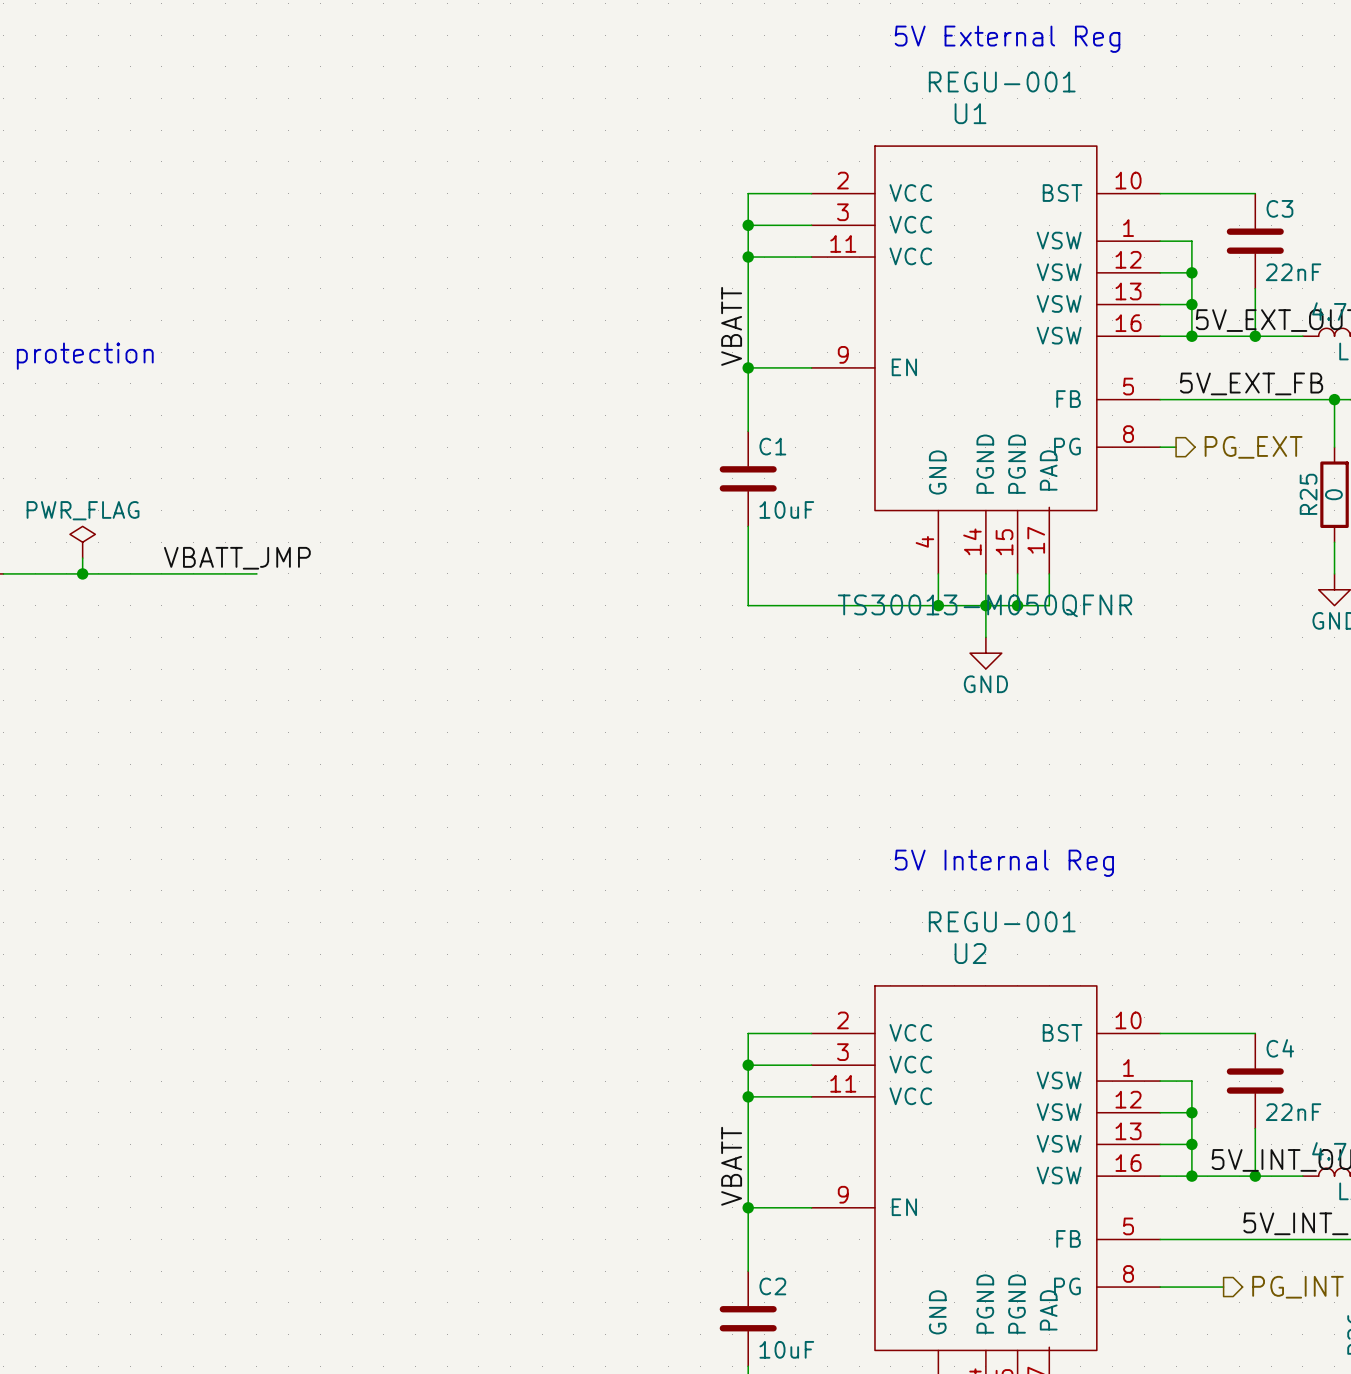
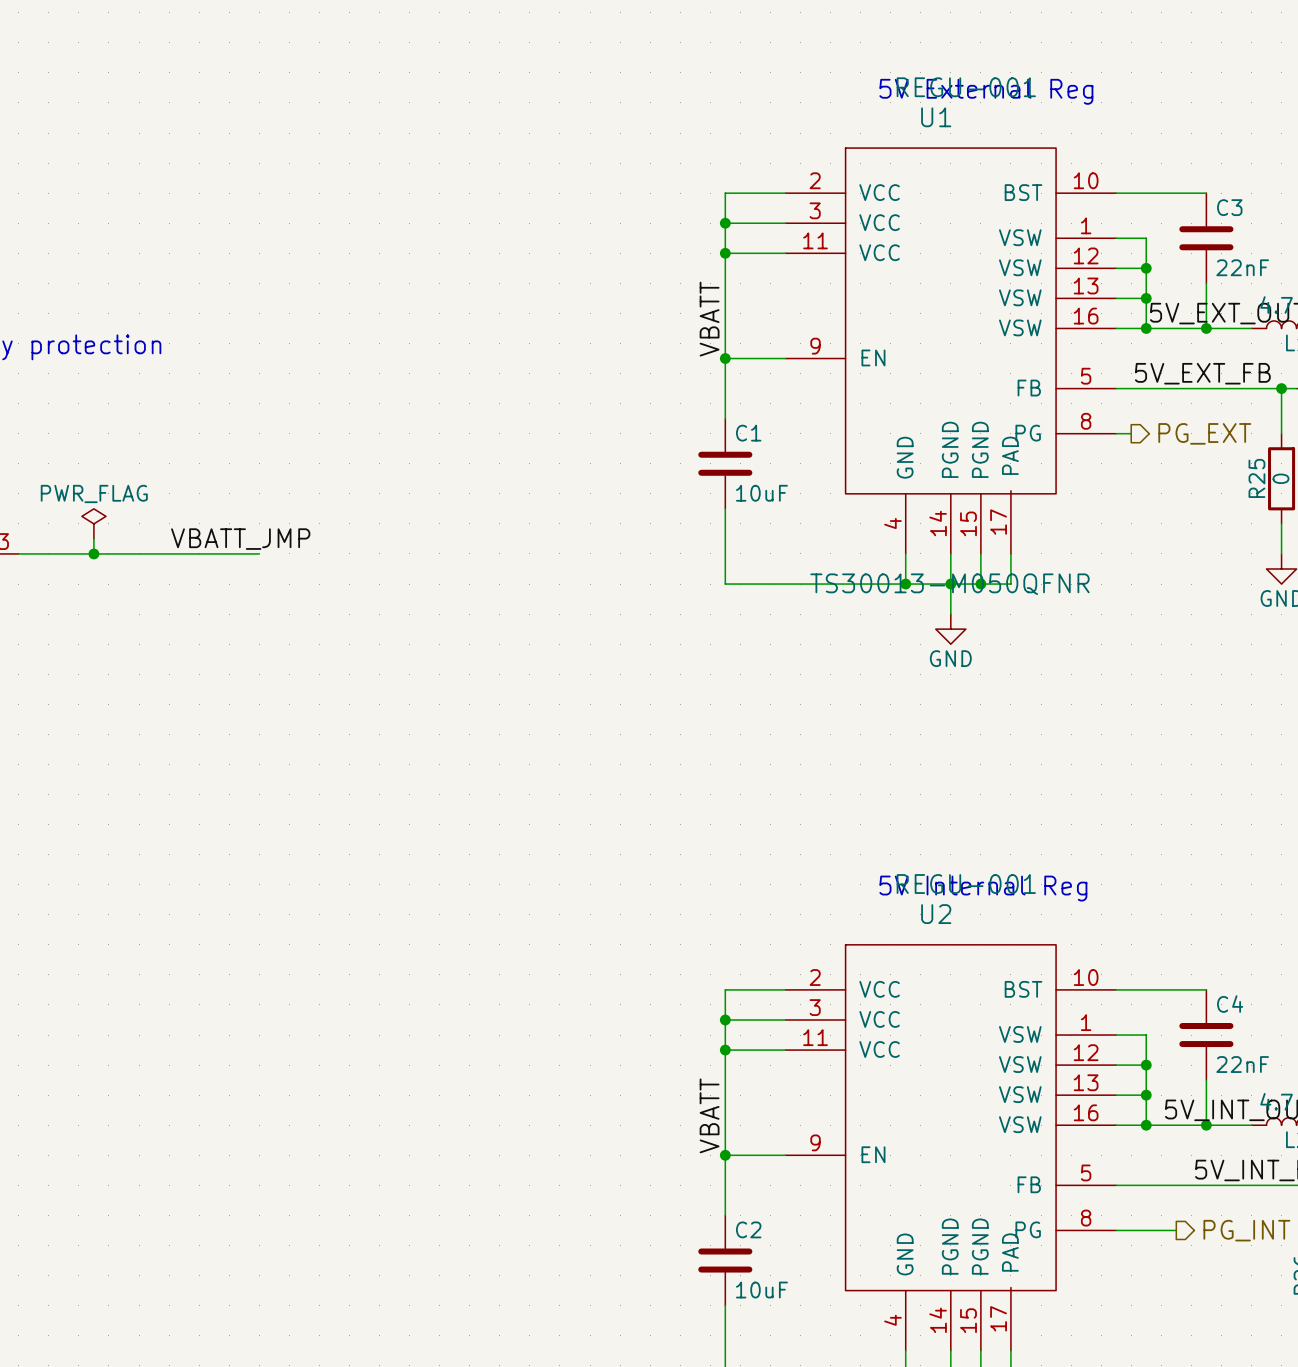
text position: 5V External Reg (1007, 39) -> 5V External Reg (986, 91)
text position: 5V Internal Reg (1004, 863) -> 5V Internal Reg (983, 888)

